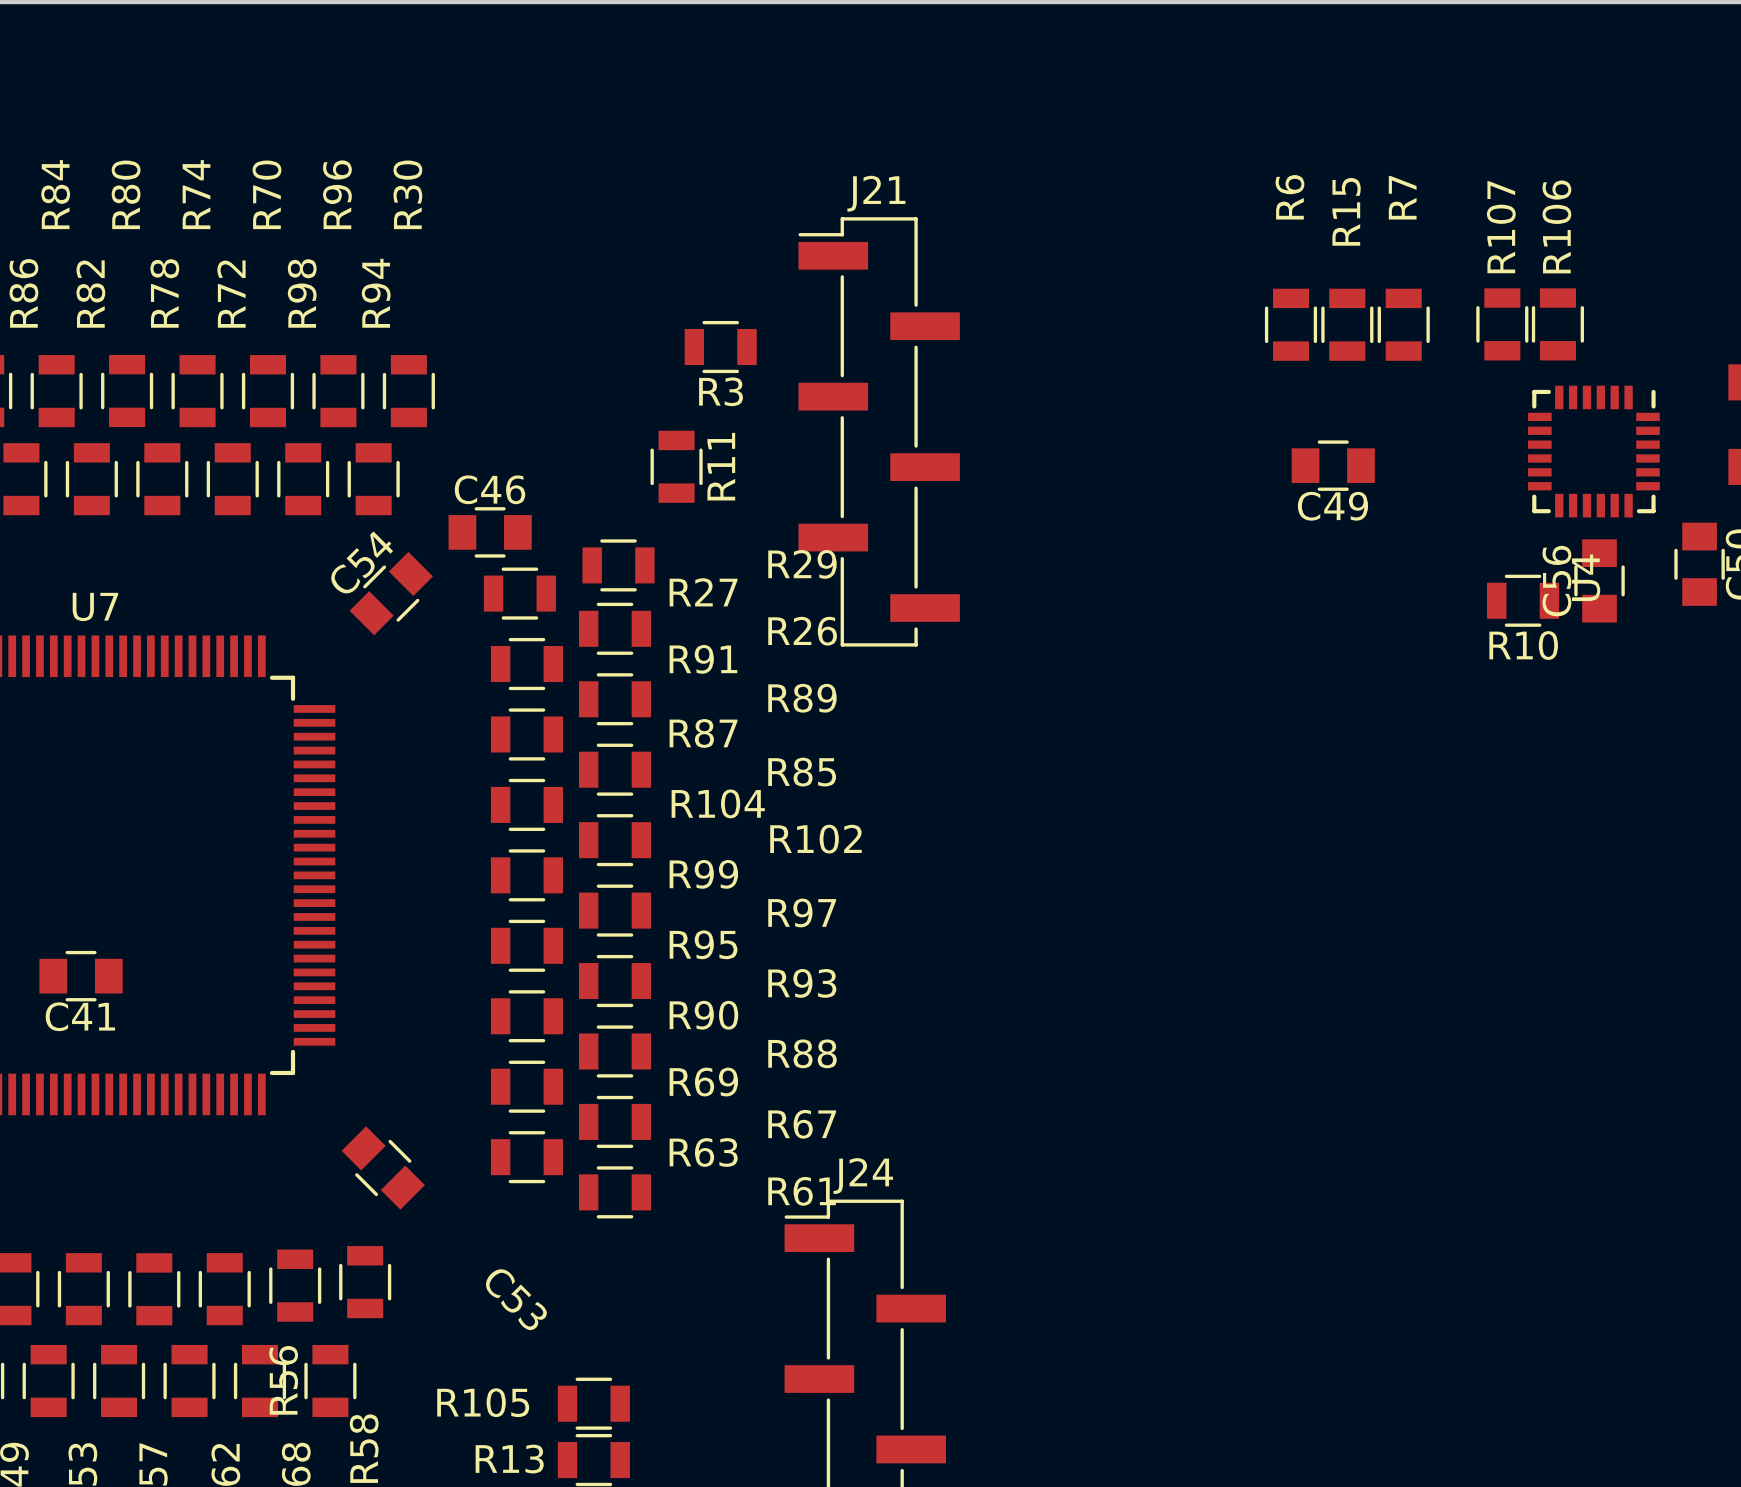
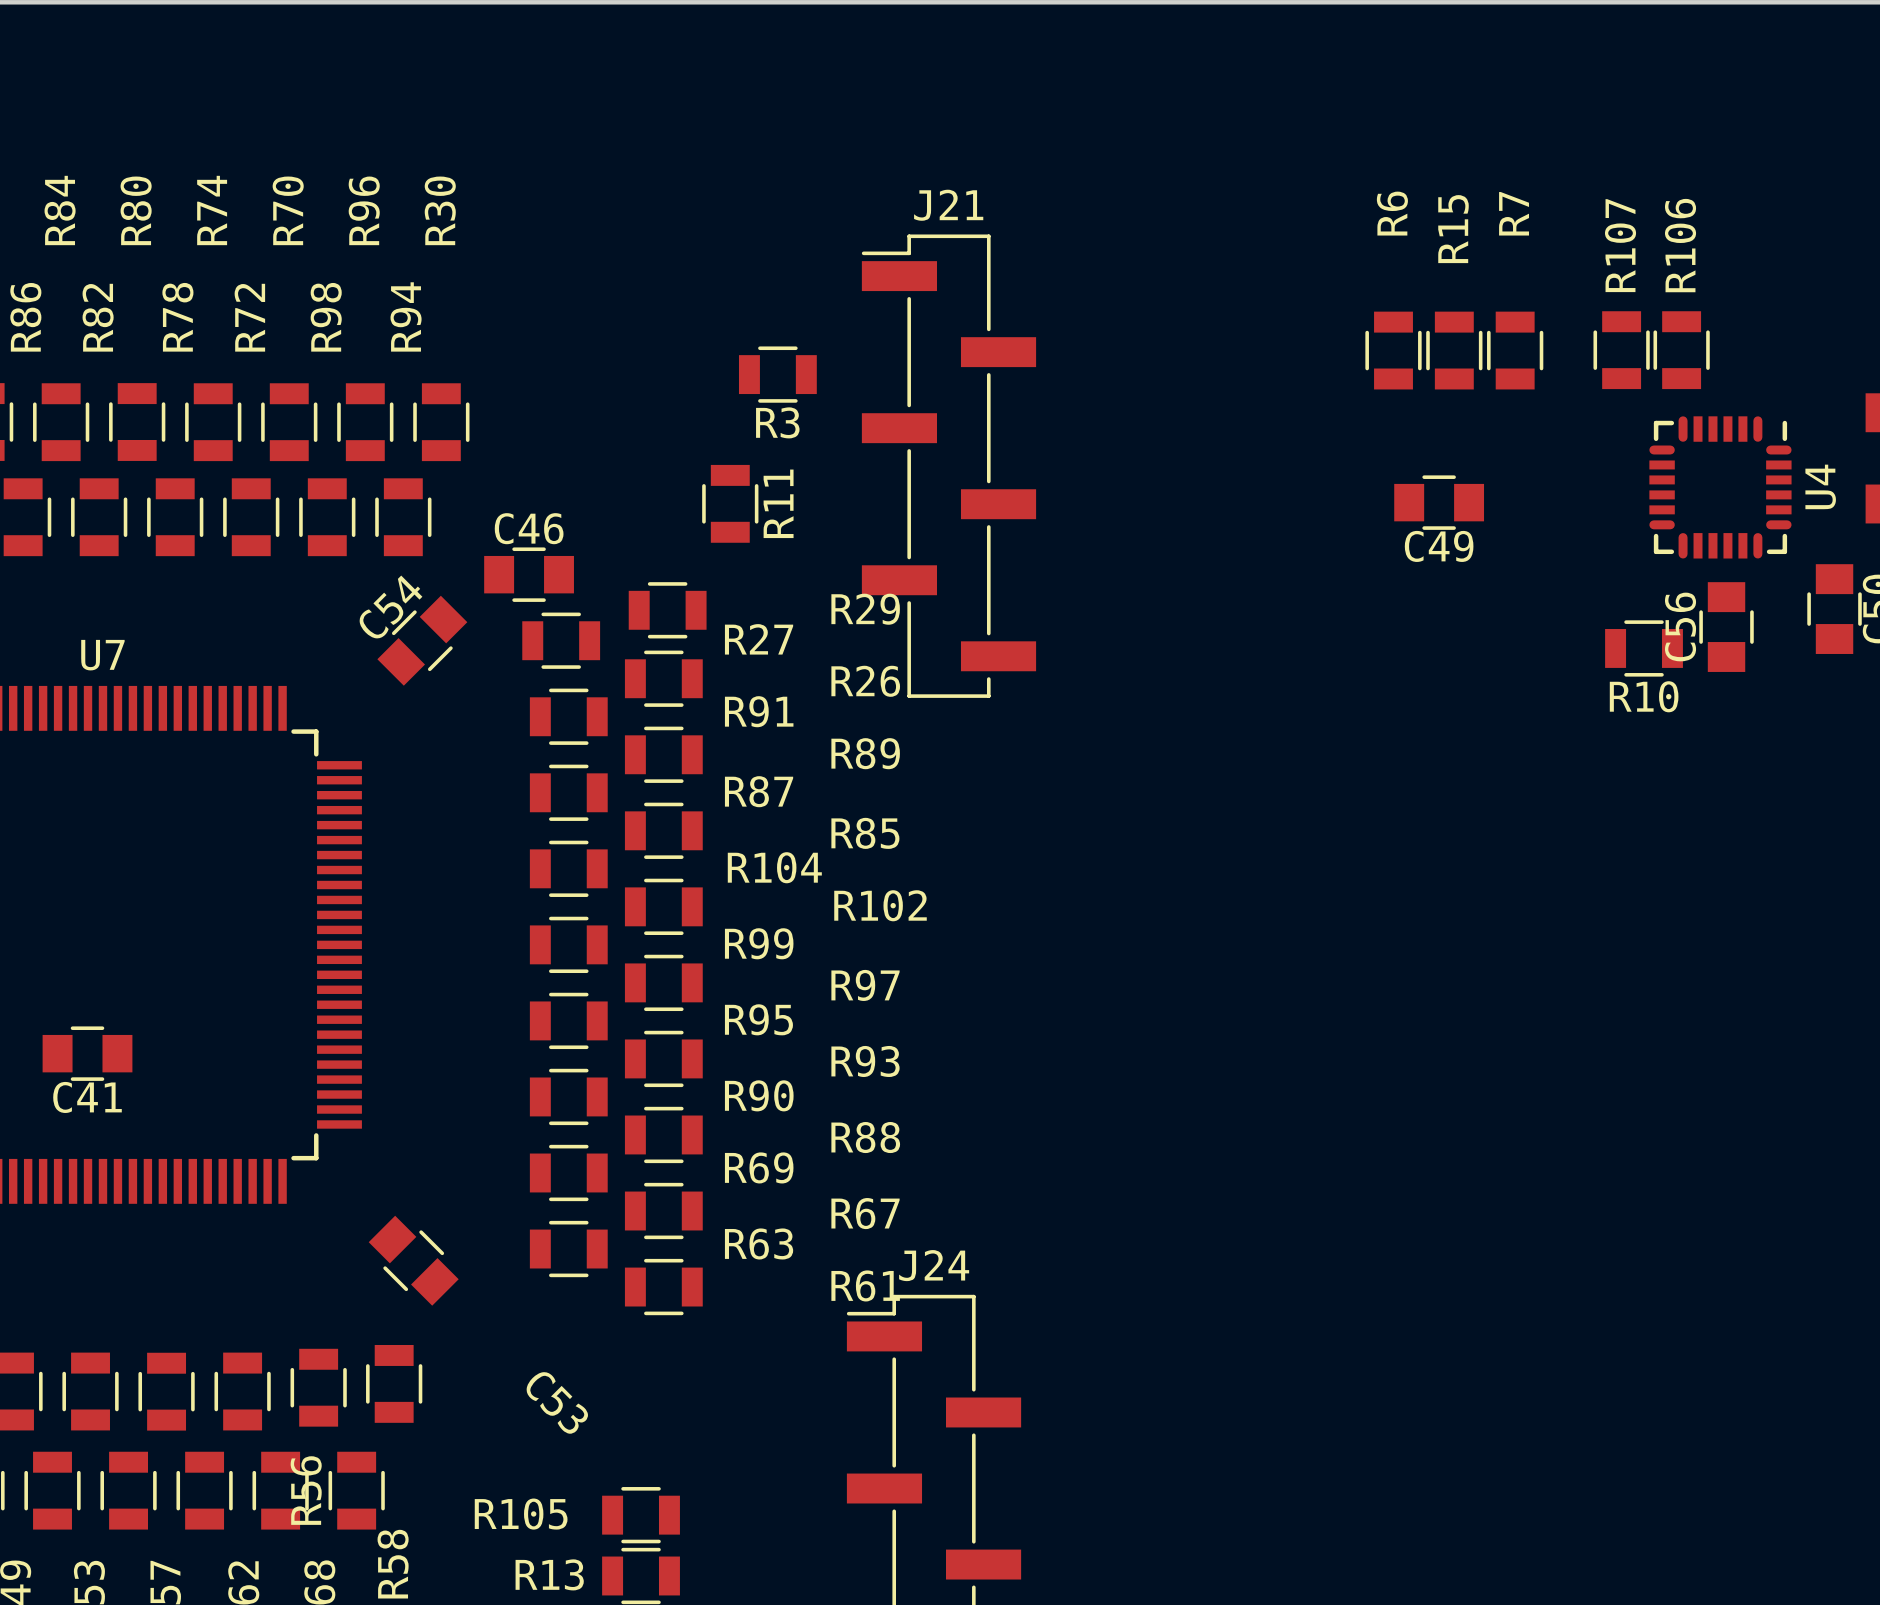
U4 footprint: [1528, 385, 1660, 518] -> [1649, 416, 1792, 559]
U4 name position: U4 (1586, 577) -> U4 (1820, 486)

